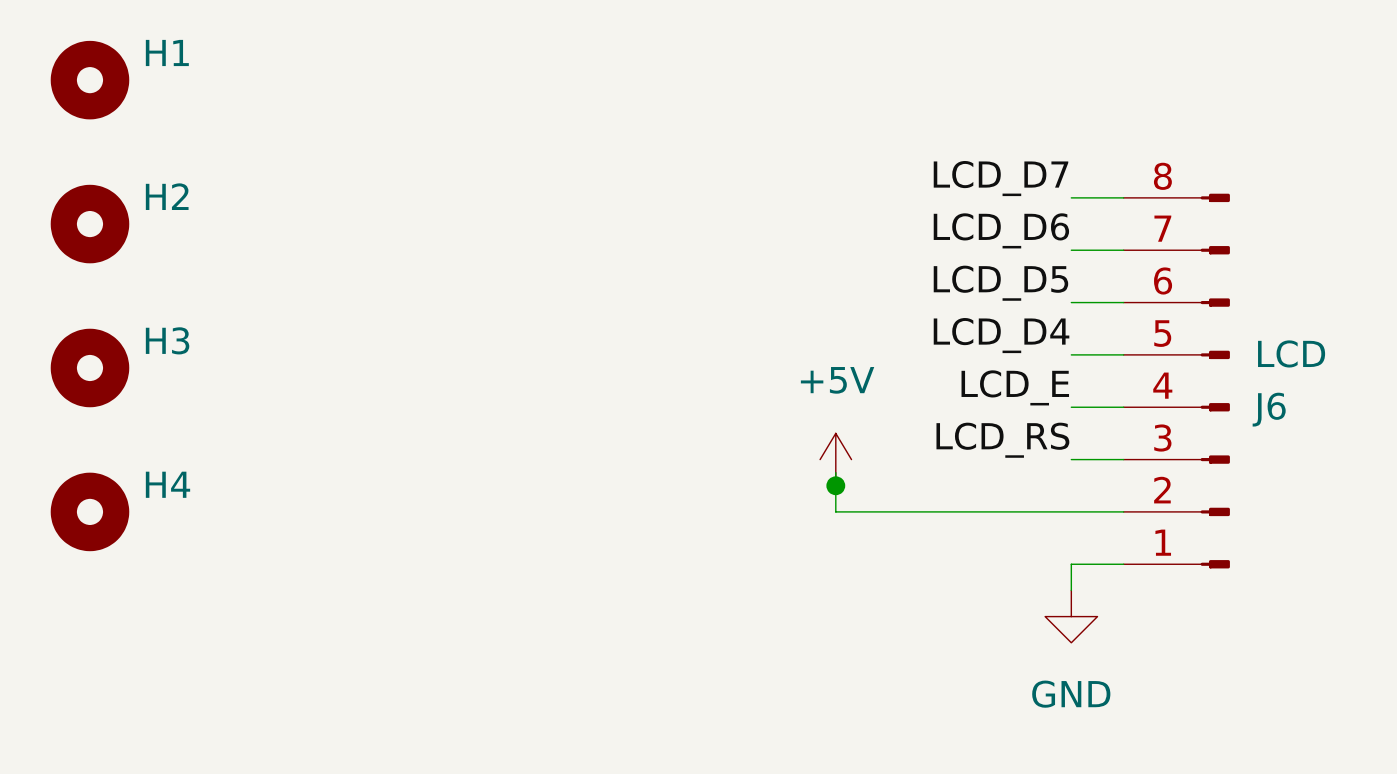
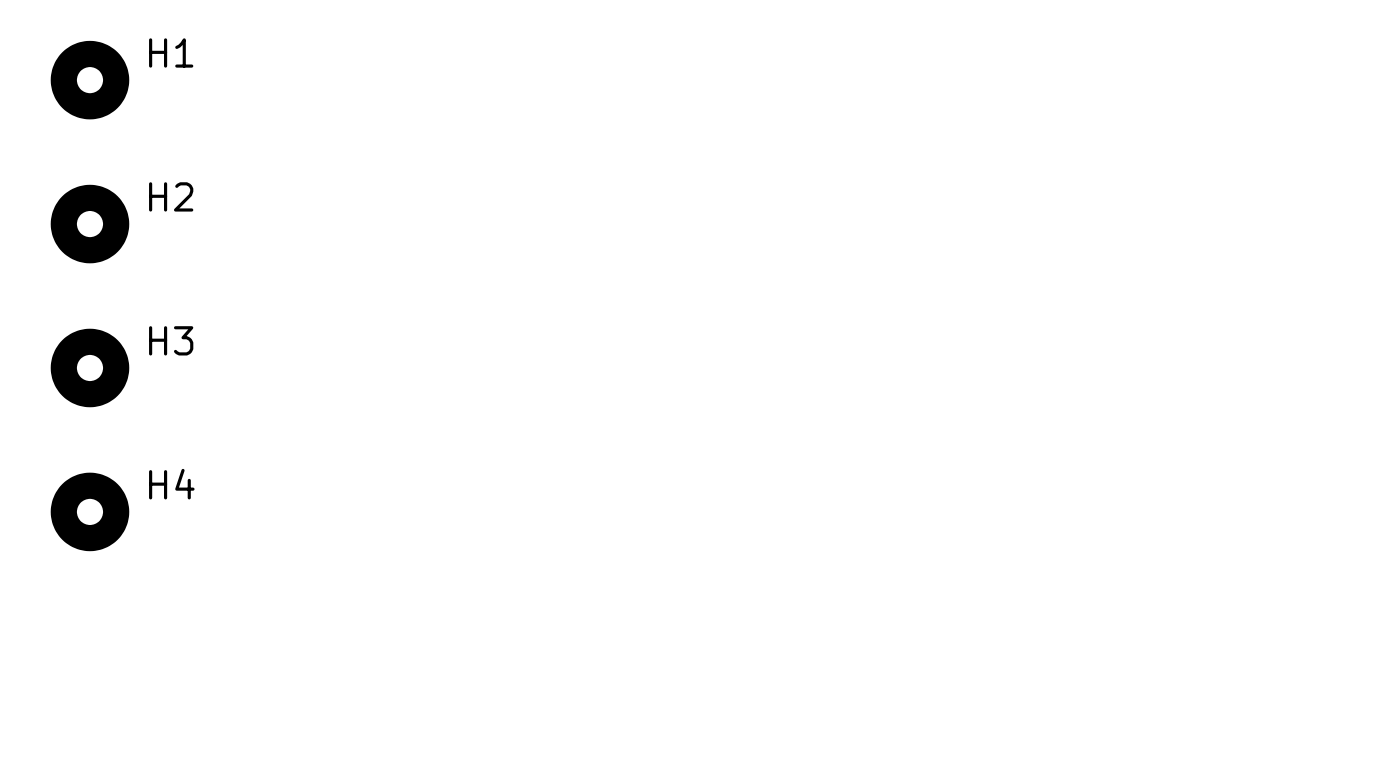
label: LCD_D7 (1000, 178) -> none
wire: (1071, 197) (1123, 197) -> none
label: LCD_D6 (1001, 230) -> none
wire: (1071, 250) (1123, 250) -> none
label: LCD_D5 (1000, 283) -> none
wire: (1071, 302) (1123, 302) -> none
label: LCD_D4 (1001, 335) -> none
wire: (1071, 354) (1123, 354) -> none
J6: LCD (1176, 381) -> none
label: LCD_E (1015, 387) -> none
wire: (1071, 407) (1123, 407) -> none
label: LCD_RS (1002, 440) -> none
power symbol: +5V (835, 459) -> none
wire: (1071, 459) (1123, 459) -> none
wire: (835, 472) (835, 511) (1123, 511) -> none
junction: (835, 485) -> none
wire: (1123, 564) (1071, 564) (1071, 590) -> none
power symbol: GND (1071, 616) -> none

